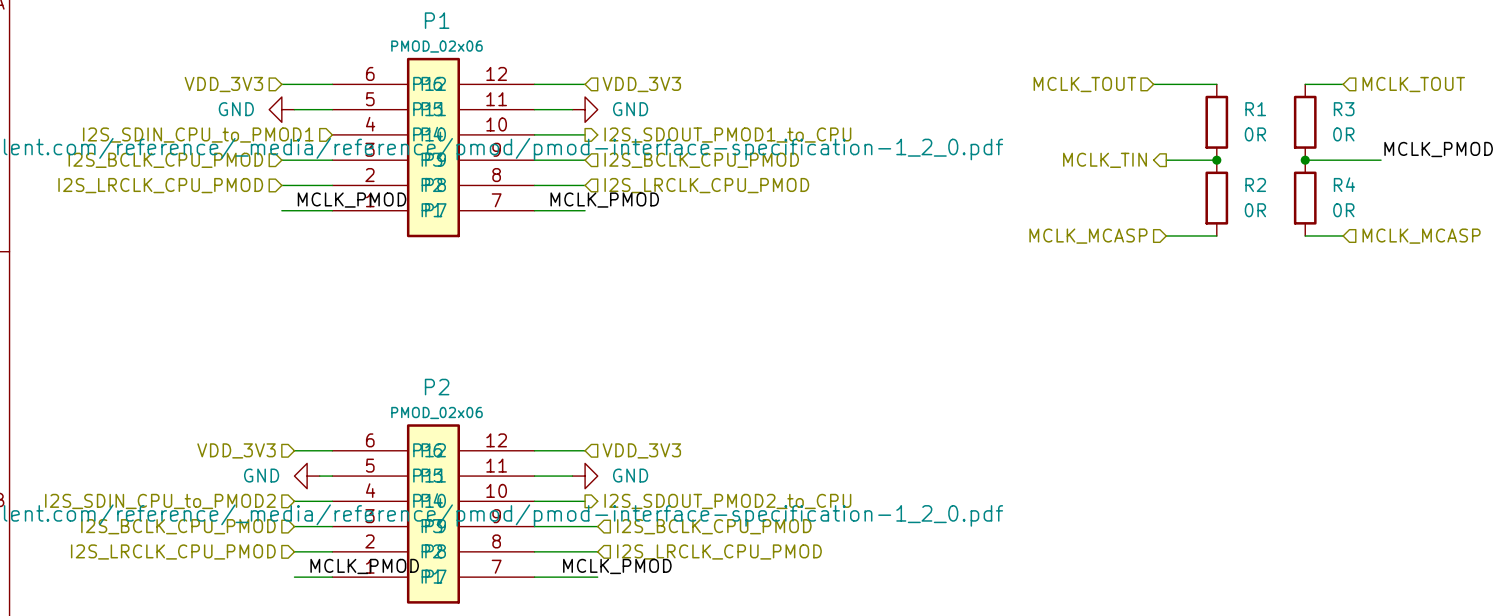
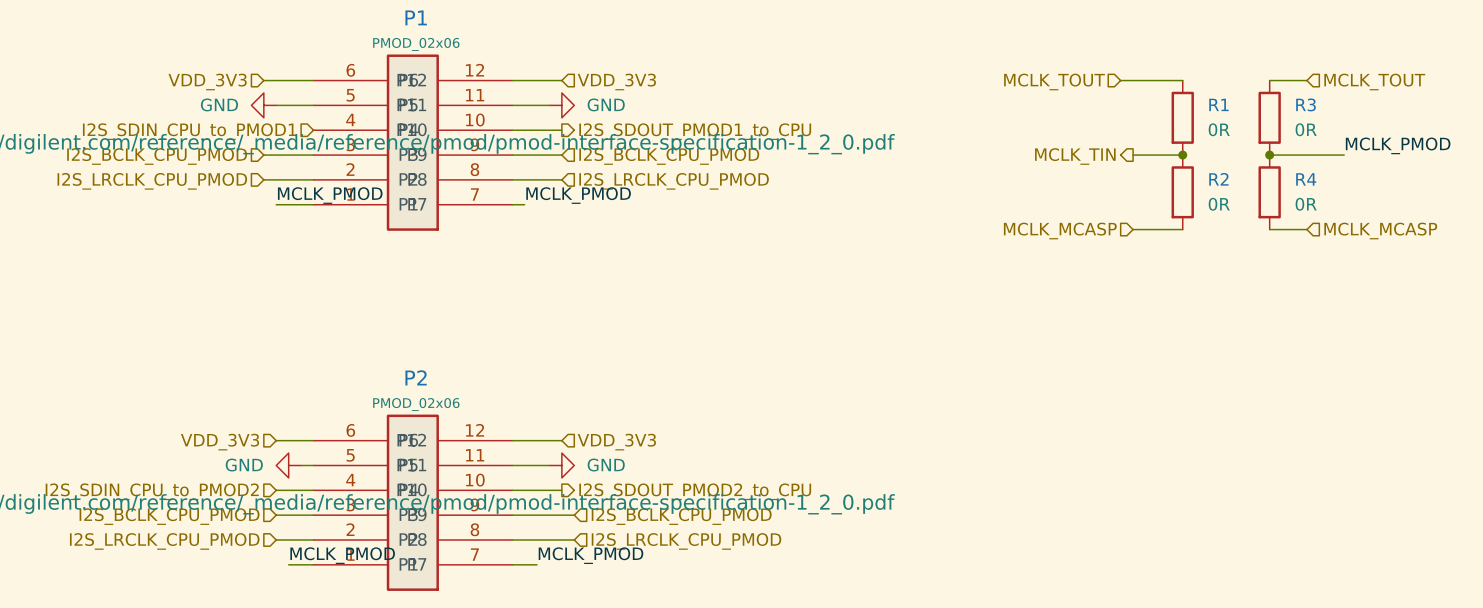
wire: (281, 210) (294, 210) -> none
wire: (547, 210) (585, 210) -> none
wire: (294, 577) (307, 577) -> none
wire: (559, 577) (597, 577) -> none

